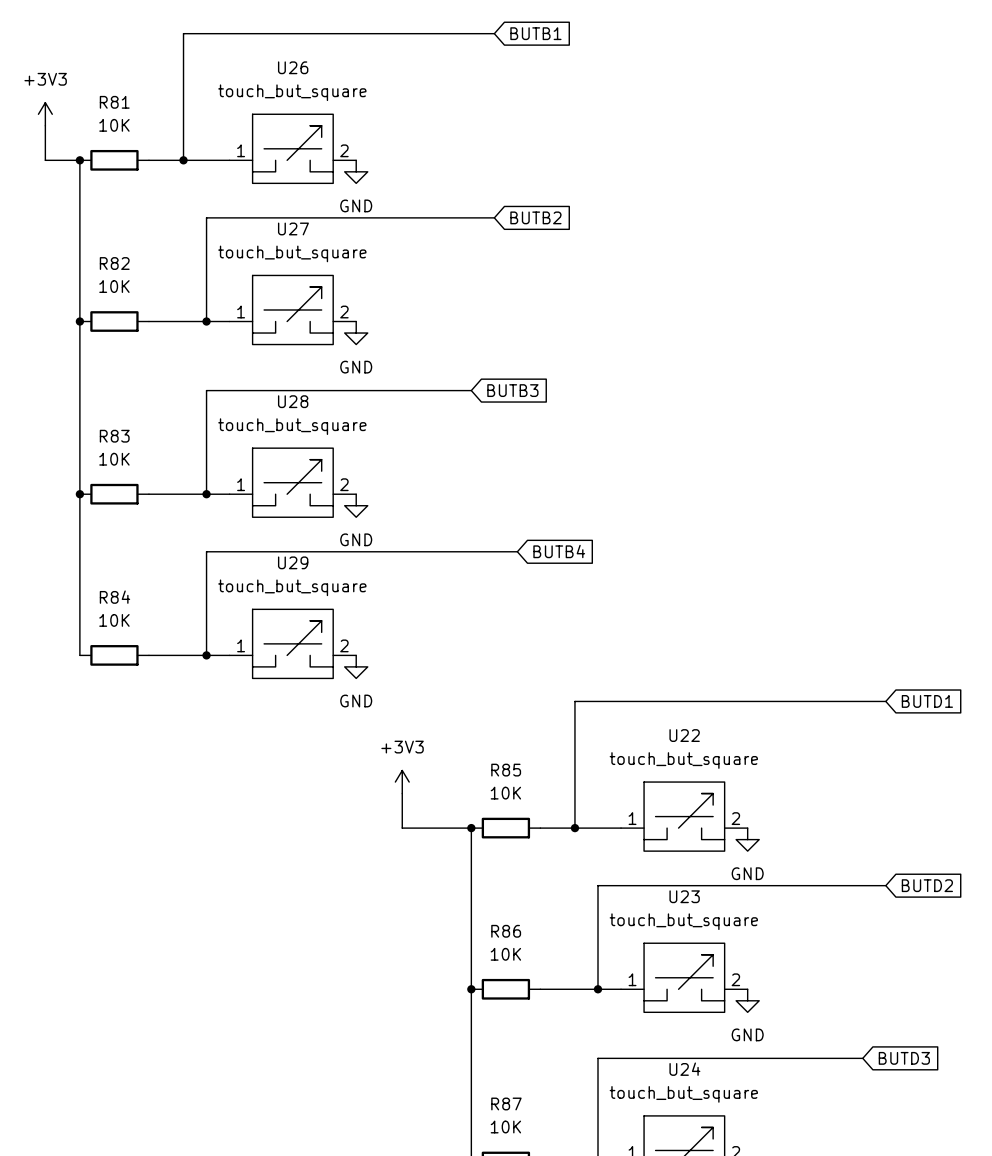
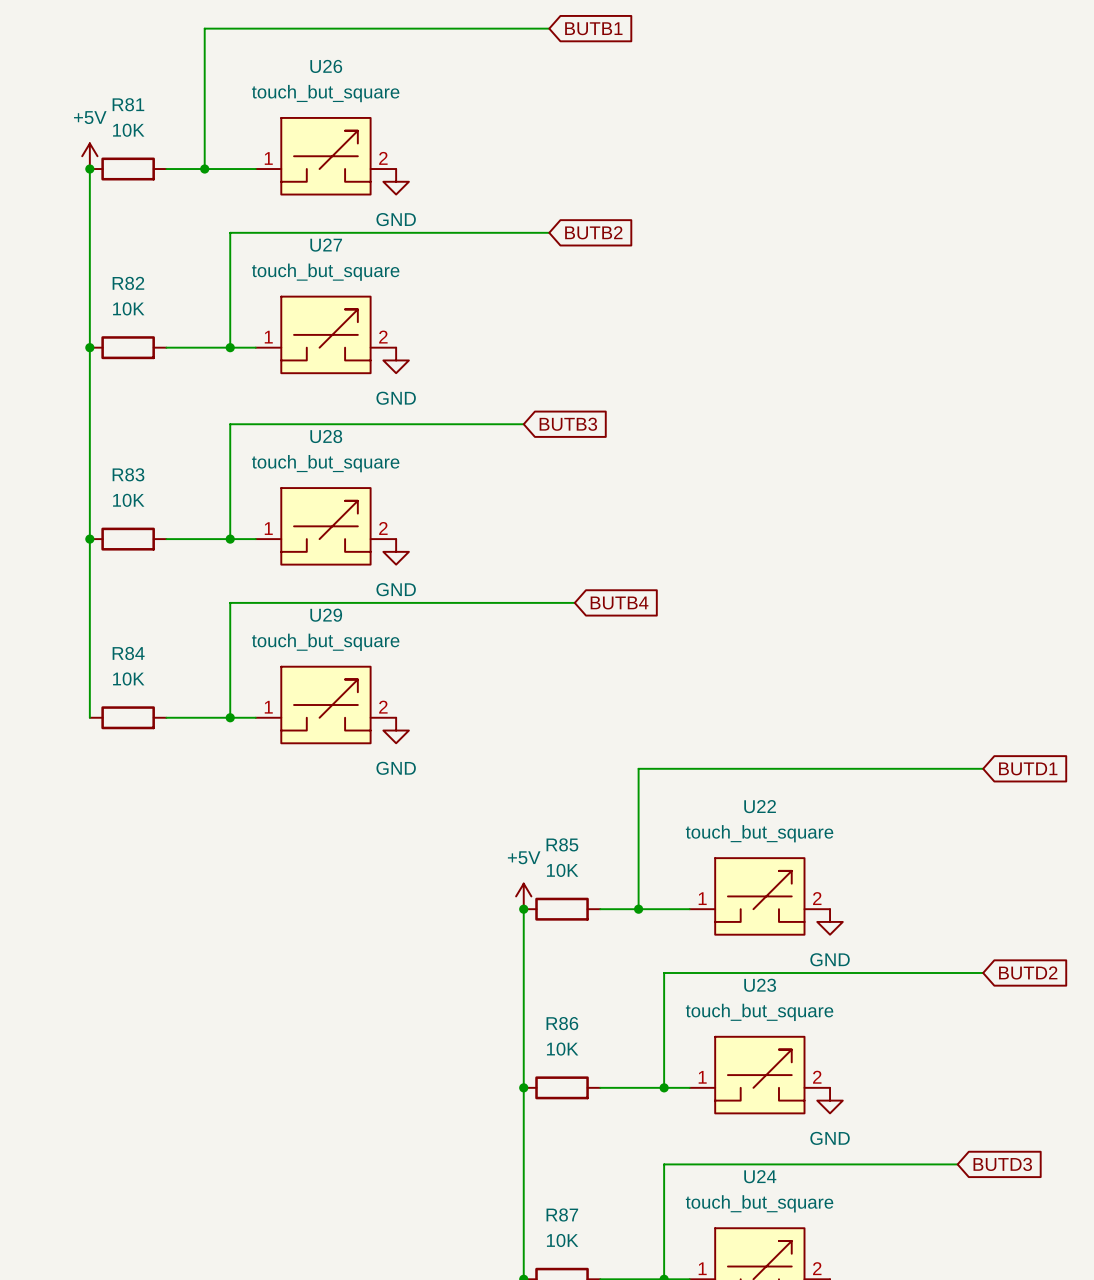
power symbol: +3V3 (45, 114) -> none
wire: (45, 125) (45, 160) (79, 160) -> none
power symbol: none -> +5V (89, 156)
power symbol: +3V3 (402, 782) -> none
wire: (402, 793) (402, 828) (471, 828) -> none
power symbol: none -> +5V (523, 896)

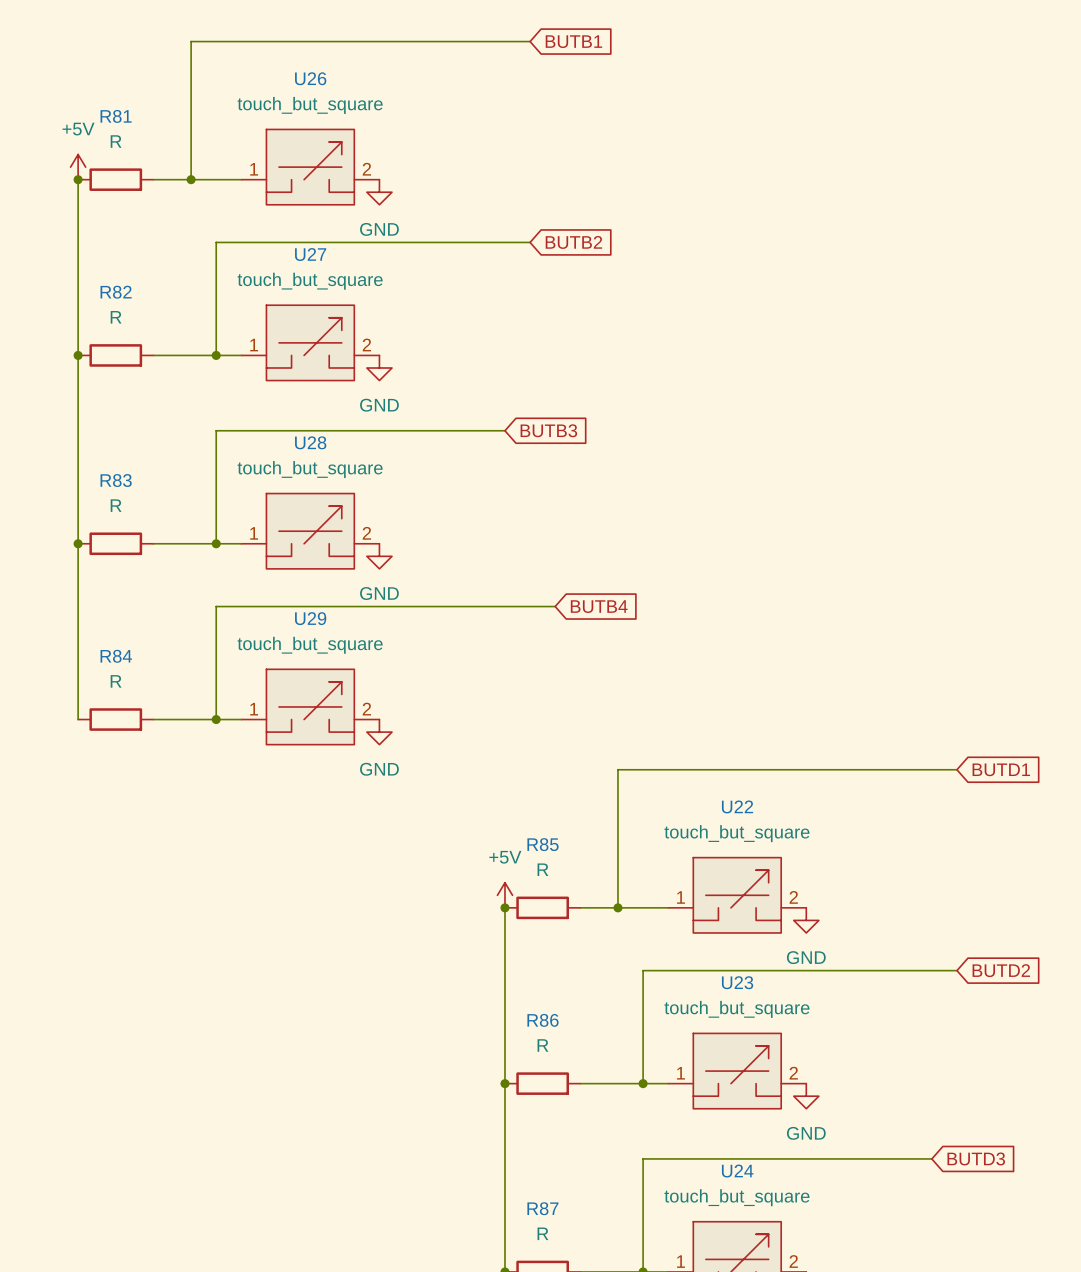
R81 value: 10K (128, 130) -> R (116, 141)
R82 value: 10K (128, 308) -> R (116, 317)
R83 value: 10K (128, 500) -> R (116, 505)
R84 value: 10K (128, 678) -> R (116, 681)
R85 value: 10K (562, 870) -> R (542, 869)
R86 value: 10K (562, 1049) -> R (542, 1045)
R87 value: 10K (562, 1240) -> R (542, 1233)

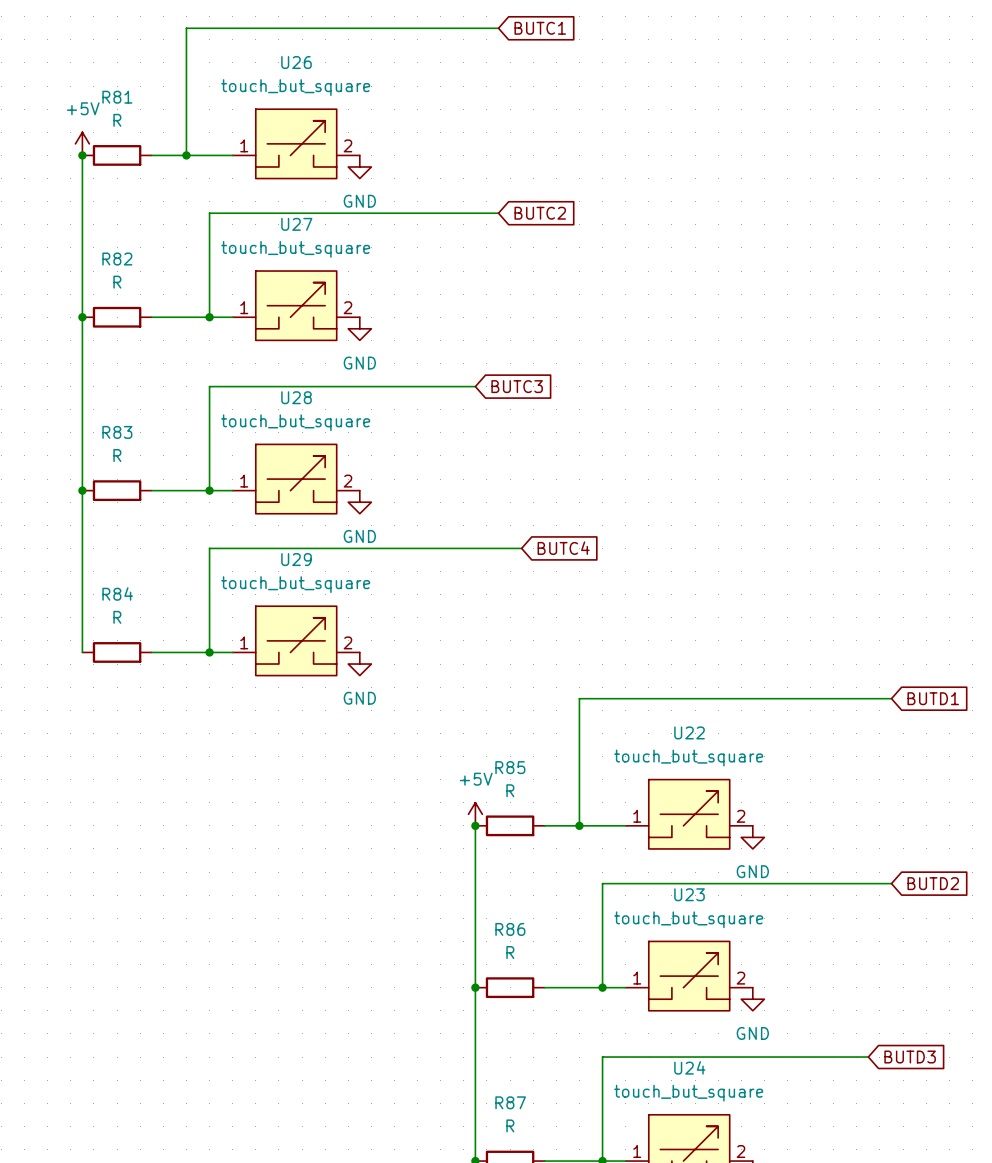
global label: BUTB1 (573, 41) -> BUTC1 (540, 28)
global label: BUTB2 (573, 242) -> BUTC2 (540, 213)
global label: BUTB3 (548, 430) -> BUTC3 (517, 386)
global label: BUTB4 (599, 606) -> BUTC4 (563, 548)

